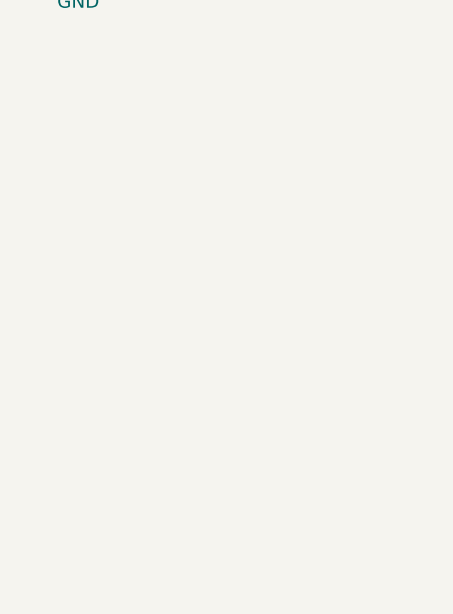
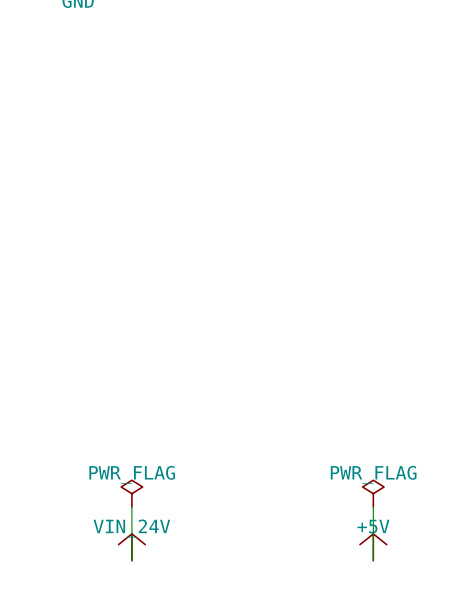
power symbol: none -> PWR_FLAG (131, 493)
power symbol: none -> PWR_FLAG (373, 493)
wire: none -> (131, 507) (131, 560)
wire: none -> (373, 507) (373, 560)
power symbol: none -> VIN_24V (131, 547)
power symbol: none -> +5V (373, 547)

